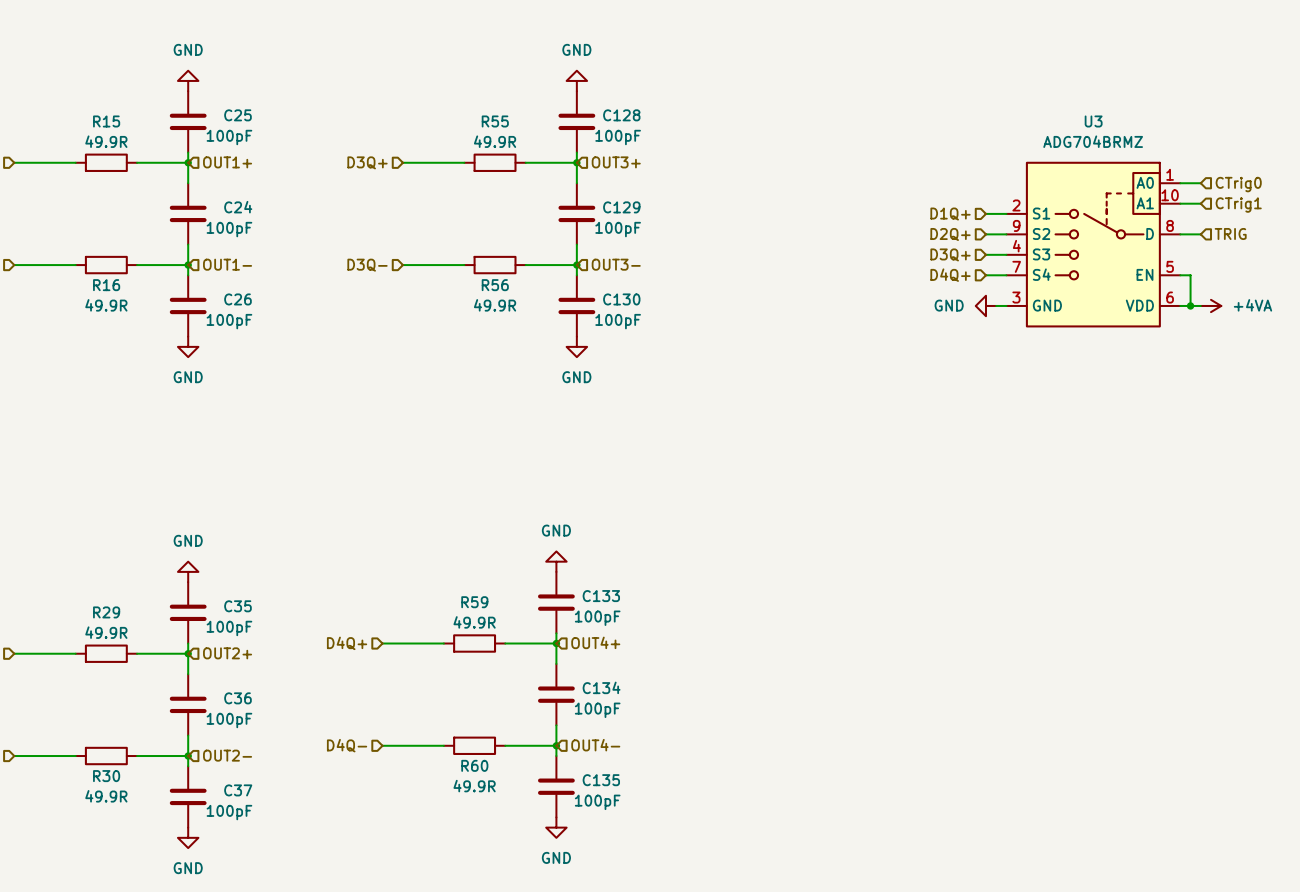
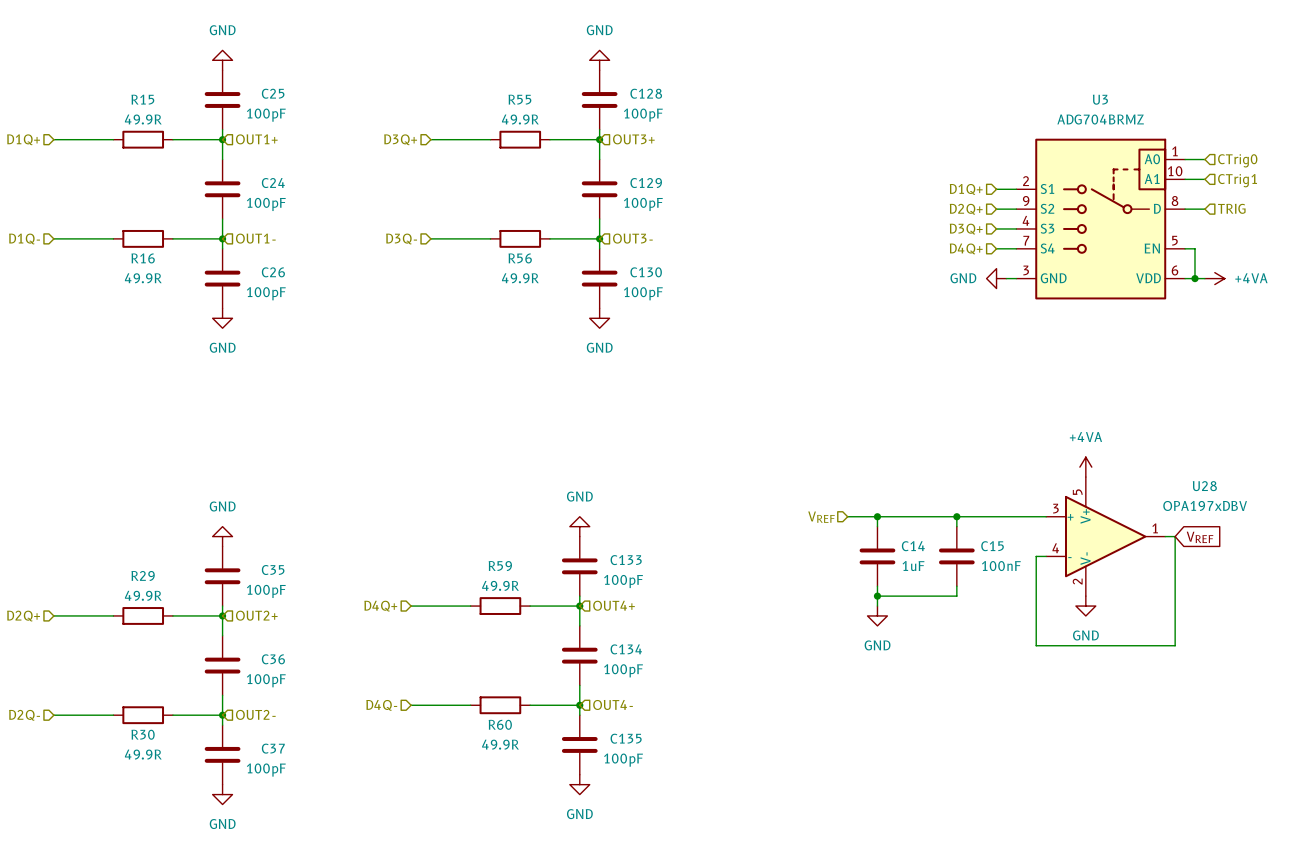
power symbol: none -> +4VA (1085, 467)
hierarchical label: none -> VREF (821, 517)
wire: none -> (847, 516) (1046, 516)
wire: none -> (877, 516) (877, 526)
junction: none -> (877, 516)
wire: none -> (956, 516) (956, 526)
junction: none -> (956, 516)
U28: none -> OPA197xDBV (1105, 536)
wire: none -> (1165, 536) (1175, 536) (1175, 645) (1036, 645) (1036, 556) (1046, 556)
global label: none -> VREF (1200, 537)
C14: none -> 1uF (877, 556)
C15: none -> 100nF (956, 556)
wire: none -> (877, 586) (877, 606)
wire: none -> (956, 586) (956, 596) (877, 596)
junction: none -> (877, 596)
power symbol: none -> GND (1085, 606)
power symbol: none -> GND (877, 615)

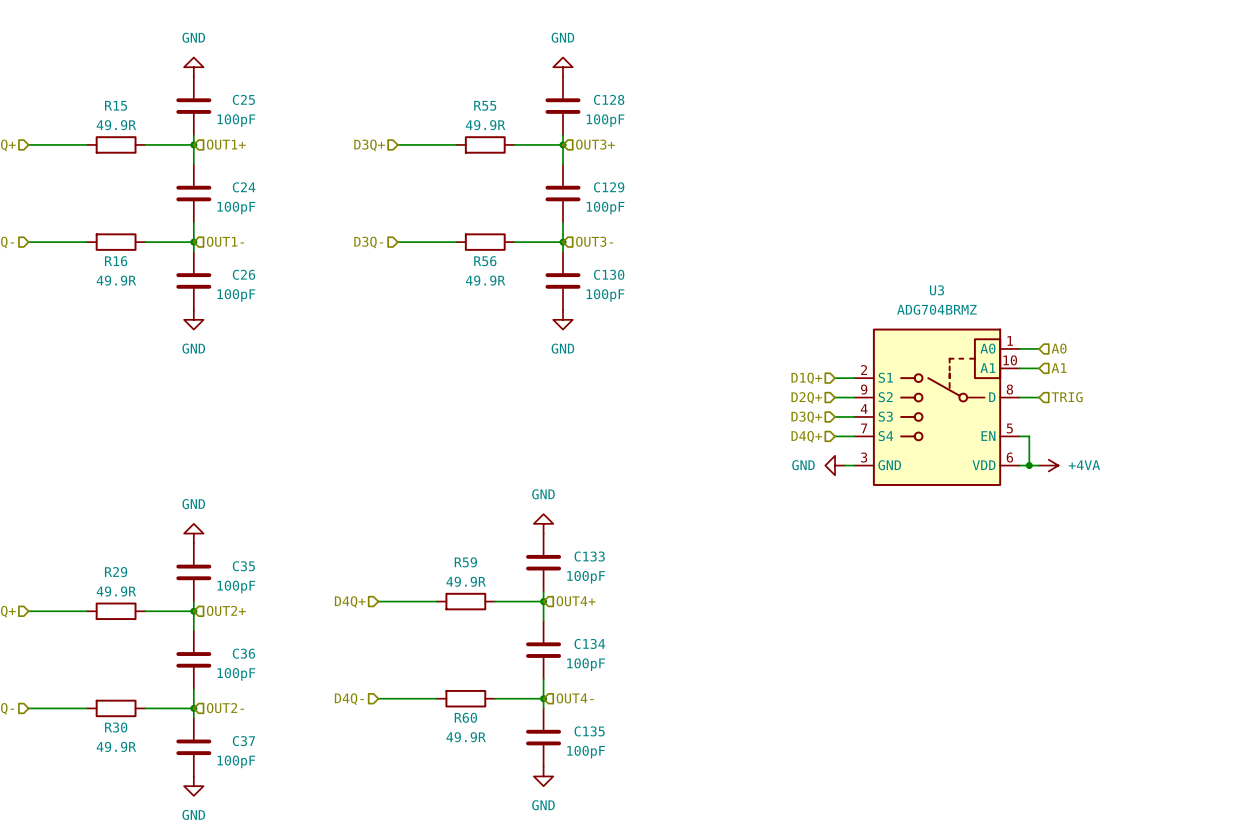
wire: (1185, 159) (1204, 159) -> none
hierarchical label: CTrig0 (1237, 160) -> none
wire: (1185, 179) (1204, 179) -> none
hierarchical label: CTrig1 (1237, 180) -> none
hierarchical label: D1Q+ (966, 189) -> none
wire: (996, 189) (1016, 189) -> none
hierarchical label: TRIG (1231, 208) -> none
hierarchical label: D2Q+ (966, 209) -> none
wire: (996, 209) (1016, 209) -> none
wire: (1185, 209) (1204, 209) -> none
U3 position: (1100, 219) -> (937, 407)
wire: (996, 228) (1016, 228) -> (1019, 348) (1039, 348)
hierarchical label: D3Q+ (966, 229) -> none
hierarchical label: D4Q+ (966, 248) -> none
wire: (996, 248) (1016, 248) -> (1019, 368) (1039, 368)
wire: (1185, 248) (1194, 248) (1194, 278) -> none
power symbol: GND (996, 278) -> none
wire: (1006, 278) (1016, 278) -> none
wire: (1185, 278) (1204, 278) -> (1019, 397) (1039, 397)
junction: (1194, 278) -> none
power symbol: +4VA (1214, 278) -> none
hierarchical label: none -> A0 (1059, 348)
hierarchical label: none -> A1 (1059, 368)
hierarchical label: none -> D1Q+ (806, 378)
wire: none -> (835, 378) (854, 378)
hierarchical label: none -> D2Q+ (806, 397)
wire: none -> (835, 397) (854, 397)
hierarchical label: none -> TRIG (1067, 397)
hierarchical label: none -> D3Q+ (806, 417)
wire: none -> (835, 416) (854, 416)
hierarchical label: none -> D4Q+ (806, 436)
wire: none -> (835, 436) (854, 436)
wire: none -> (1019, 436) (1029, 436) (1029, 465)
power symbol: none -> GND (835, 465)
wire: none -> (844, 465) (854, 465)
wire: none -> (1019, 465) (1039, 465)
junction: none -> (1029, 465)
power symbol rotation: 0° (1085, 467) -> 90° clockwise (1048, 465)
wire: (847, 516) (1046, 516) -> none
wire: (877, 516) (877, 526) -> none
junction: (877, 516) -> none
wire: (956, 516) (956, 526) -> none
junction: (956, 516) -> none
hierarchical label: VREF (821, 517) -> none
U28: OPA197xDBV (1105, 536) -> none
wire: (1165, 536) (1175, 536) (1175, 645) (1036, 645) (1036, 556) (1046, 556) -> none
global label: VREF (1200, 537) -> none
C14: 1uF (877, 556) -> none
C15: 100nF (956, 556) -> none
wire: (877, 586) (877, 606) -> none
wire: (956, 586) (956, 596) (877, 596) -> none
junction: (877, 596) -> none
power symbol: GND (1085, 606) -> none
power symbol: GND (877, 615) -> none

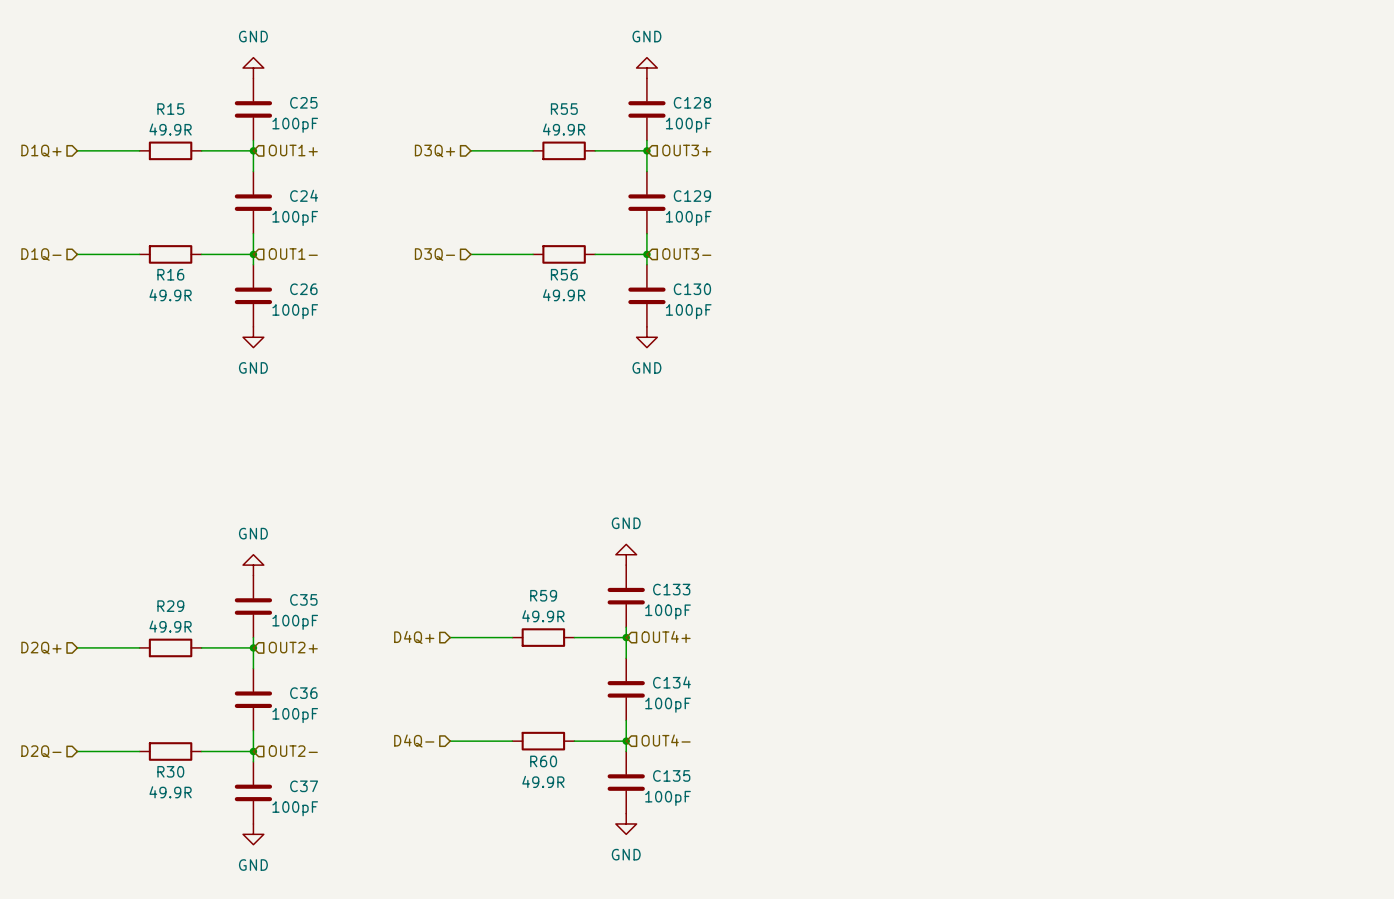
wire: (1019, 348) (1039, 348) -> none
hierarchical label: A0 (1059, 348) -> none
wire: (1019, 368) (1039, 368) -> none
hierarchical label: A1 (1059, 368) -> none
hierarchical label: D1Q+ (806, 378) -> none
wire: (835, 378) (854, 378) -> none
hierarchical label: D2Q+ (806, 397) -> none
wire: (835, 397) (854, 397) -> none
wire: (1019, 397) (1039, 397) -> none
hierarchical label: TRIG (1067, 397) -> none
U3: ADG704BRMZ (937, 407) -> none
wire: (835, 416) (854, 416) -> none
hierarchical label: D3Q+ (806, 417) -> none
hierarchical label: D4Q+ (806, 436) -> none
wire: (835, 436) (854, 436) -> none
wire: (1019, 436) (1029, 436) (1029, 465) -> none
power symbol: GND (835, 465) -> none
wire: (844, 465) (854, 465) -> none
wire: (1019, 465) (1039, 465) -> none
junction: (1029, 465) -> none
power symbol: +4VA (1048, 465) -> none

